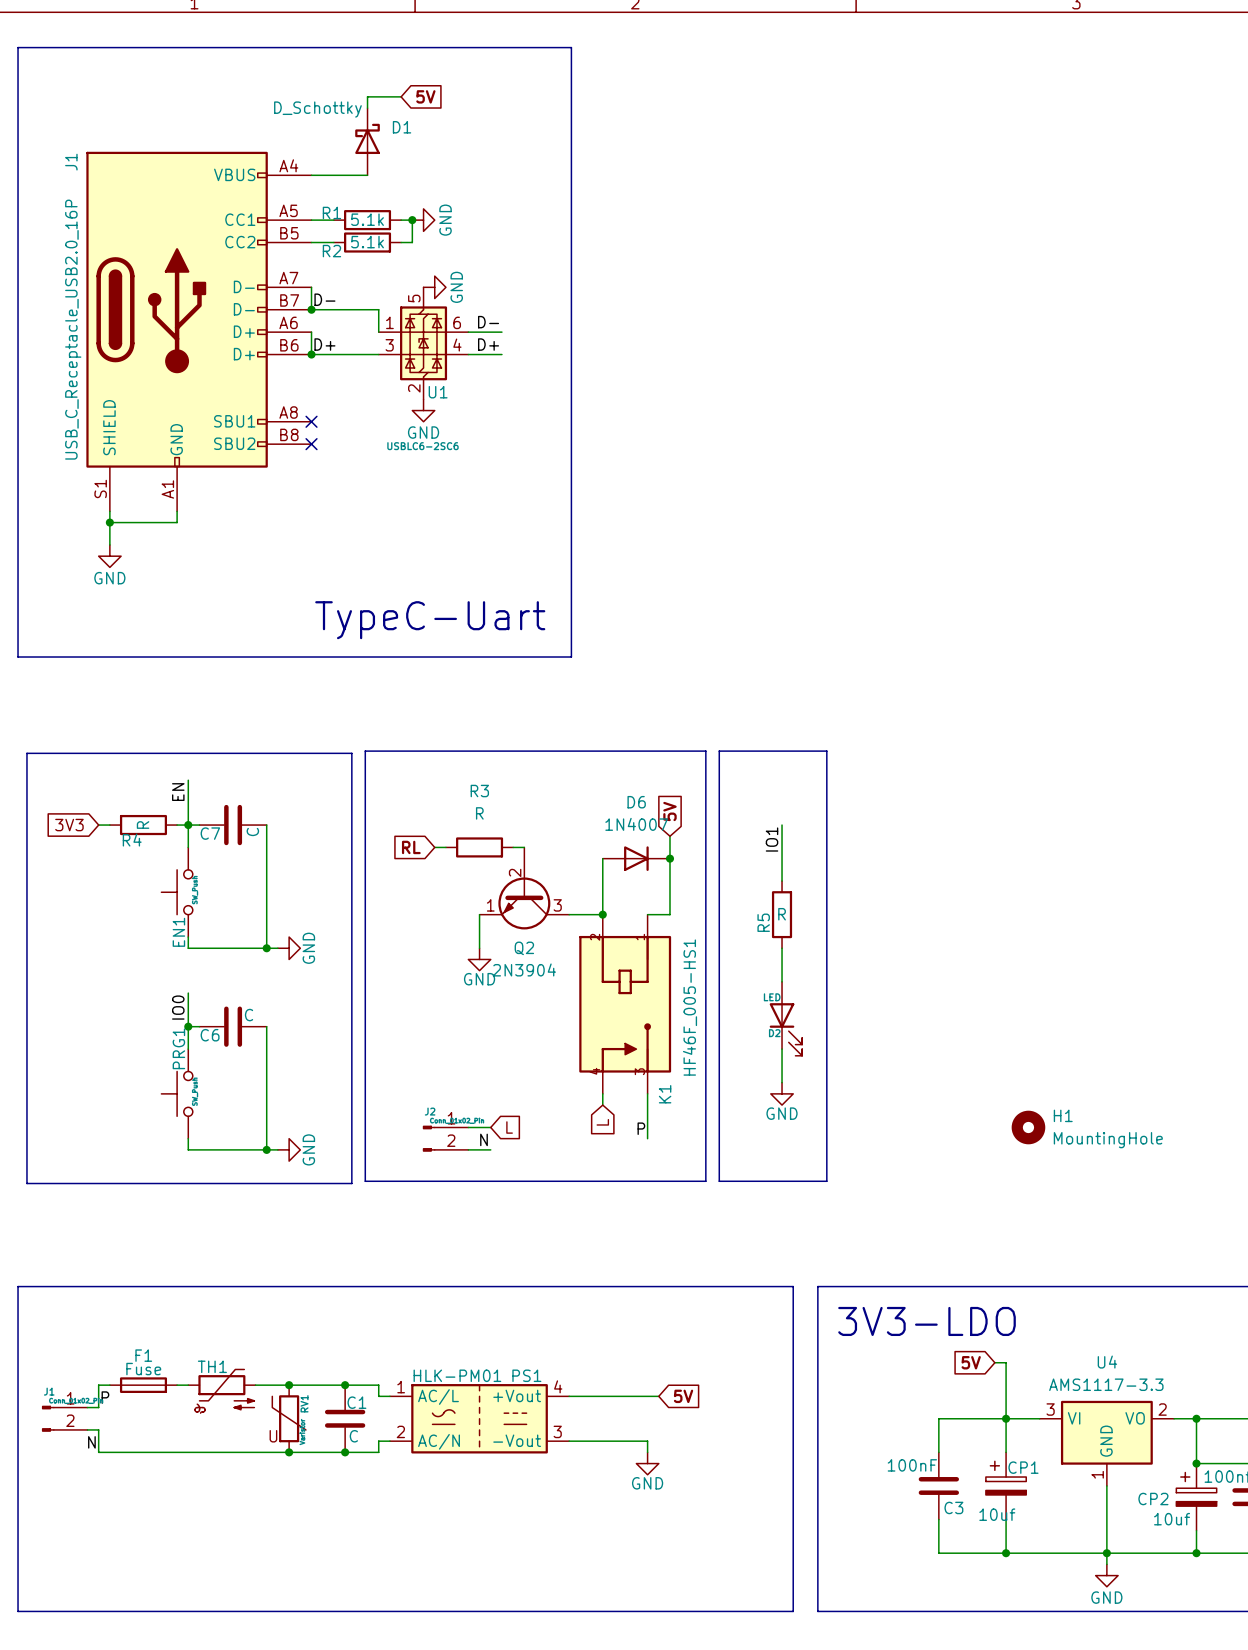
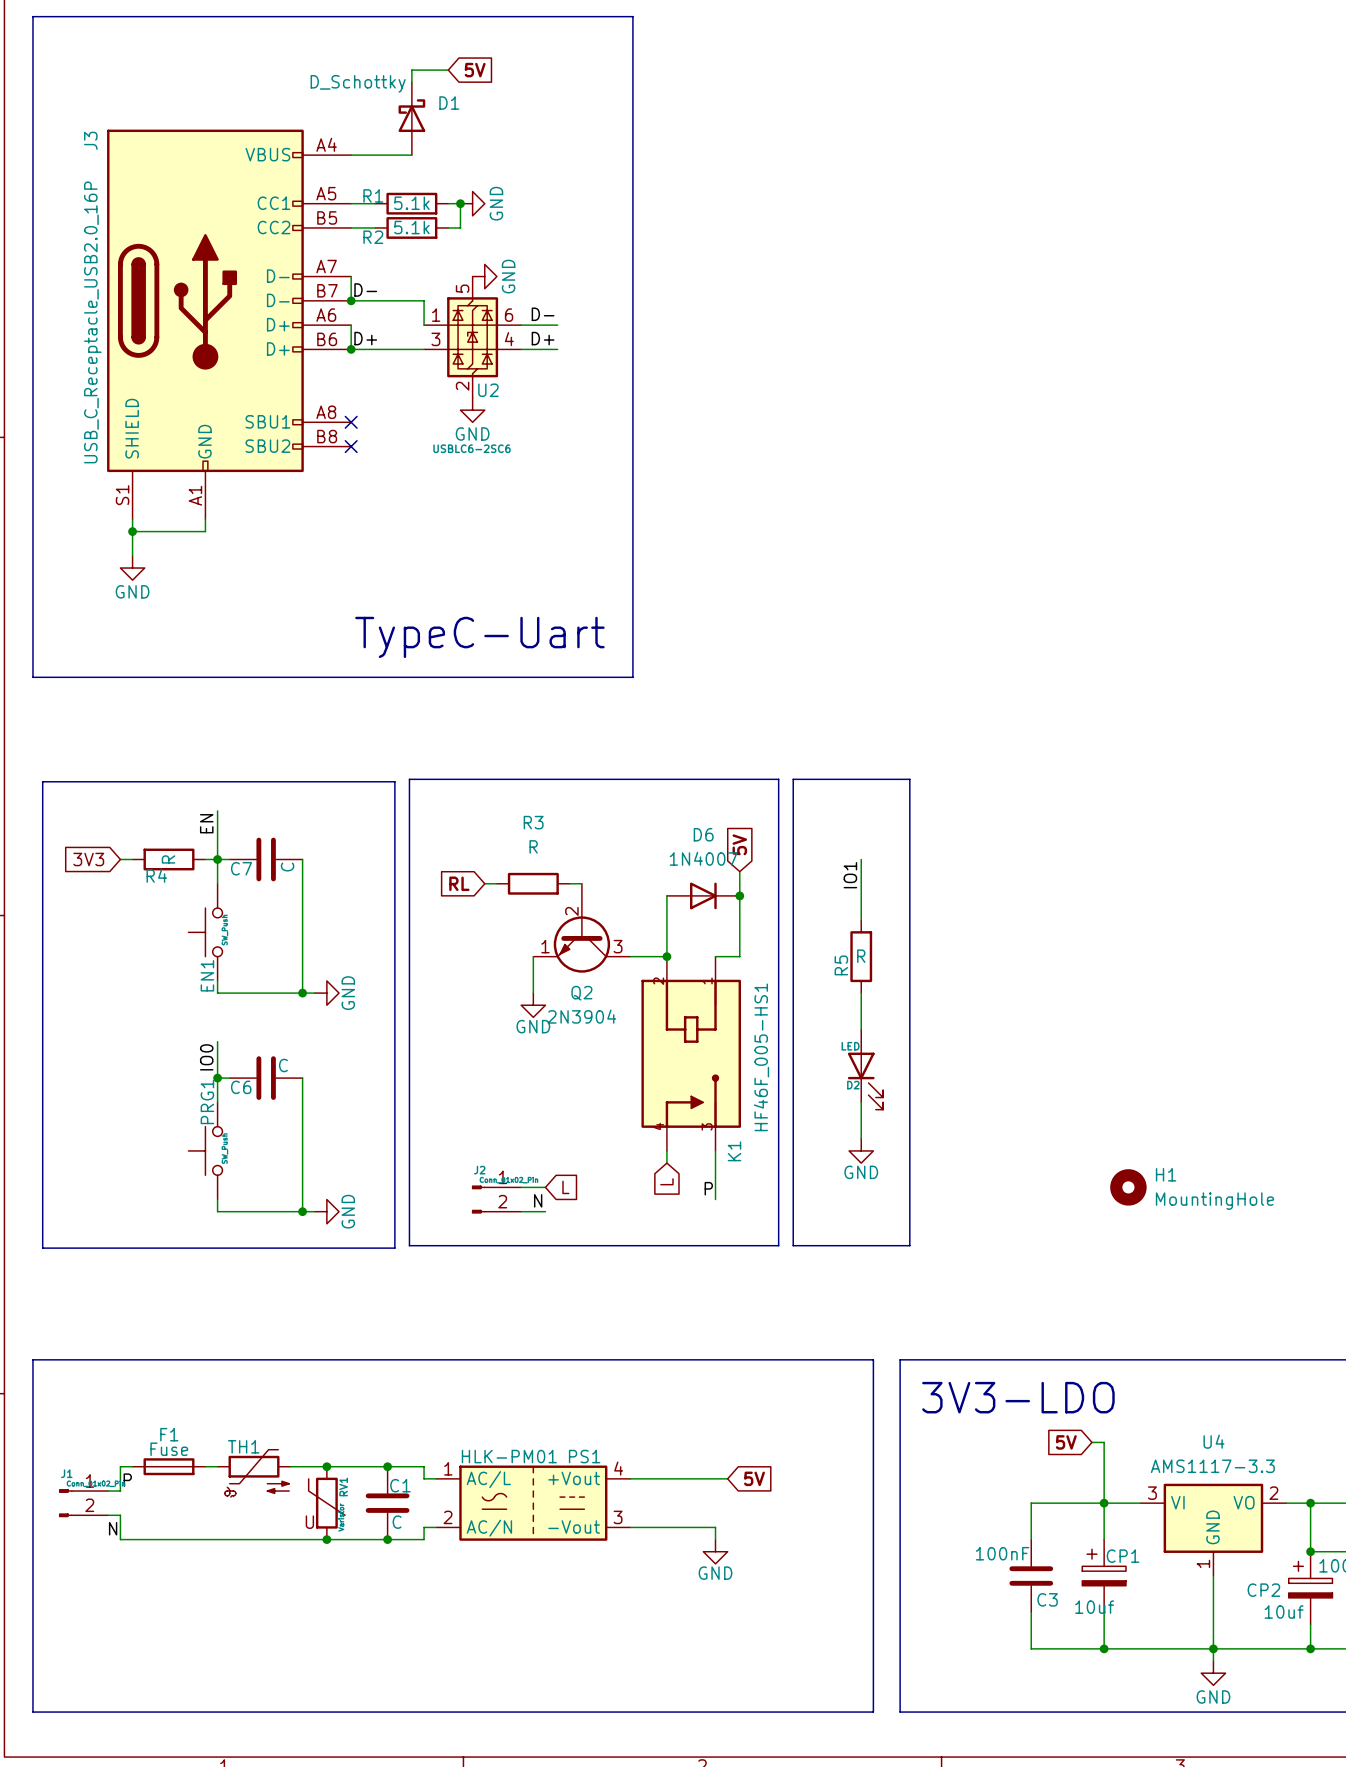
J1 name: J1 (71, 162) -> J3 (90, 140)
U1 name: U1 (438, 392) -> U2 (488, 390)

